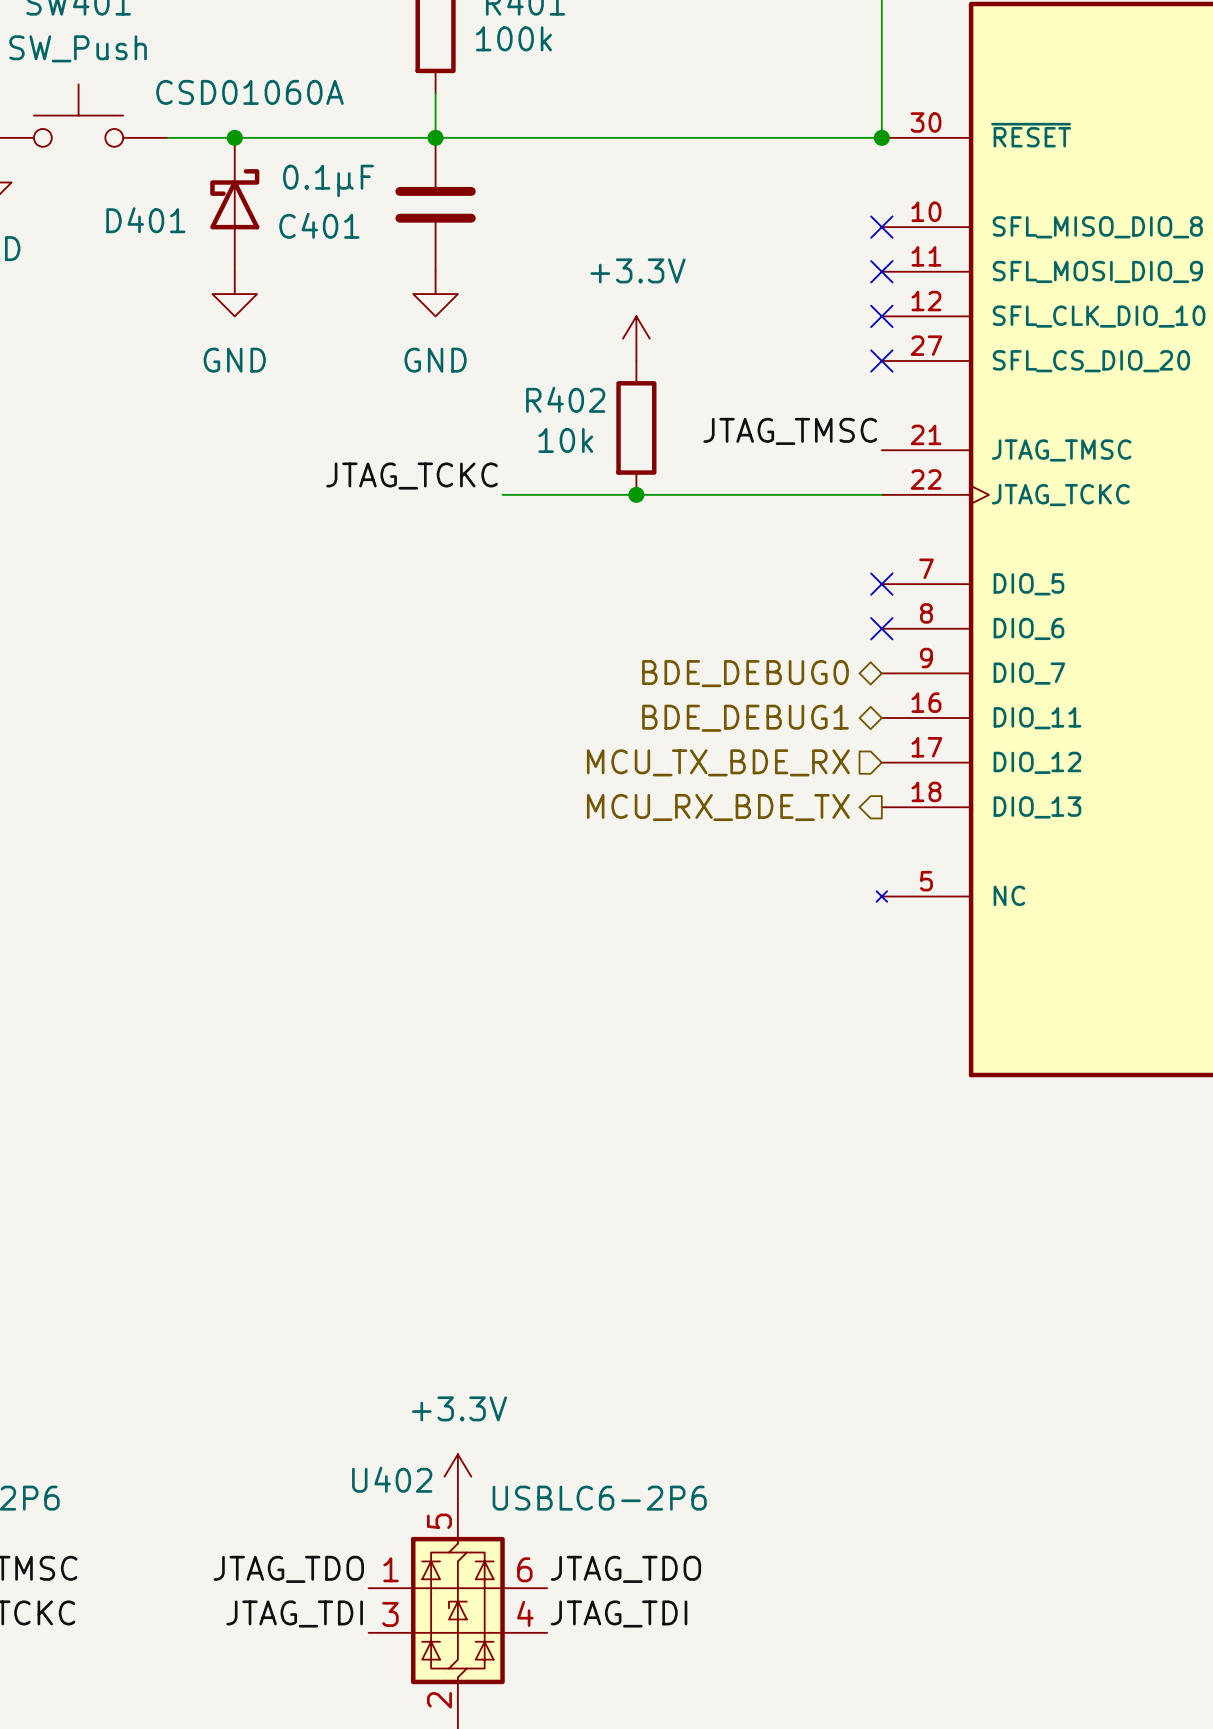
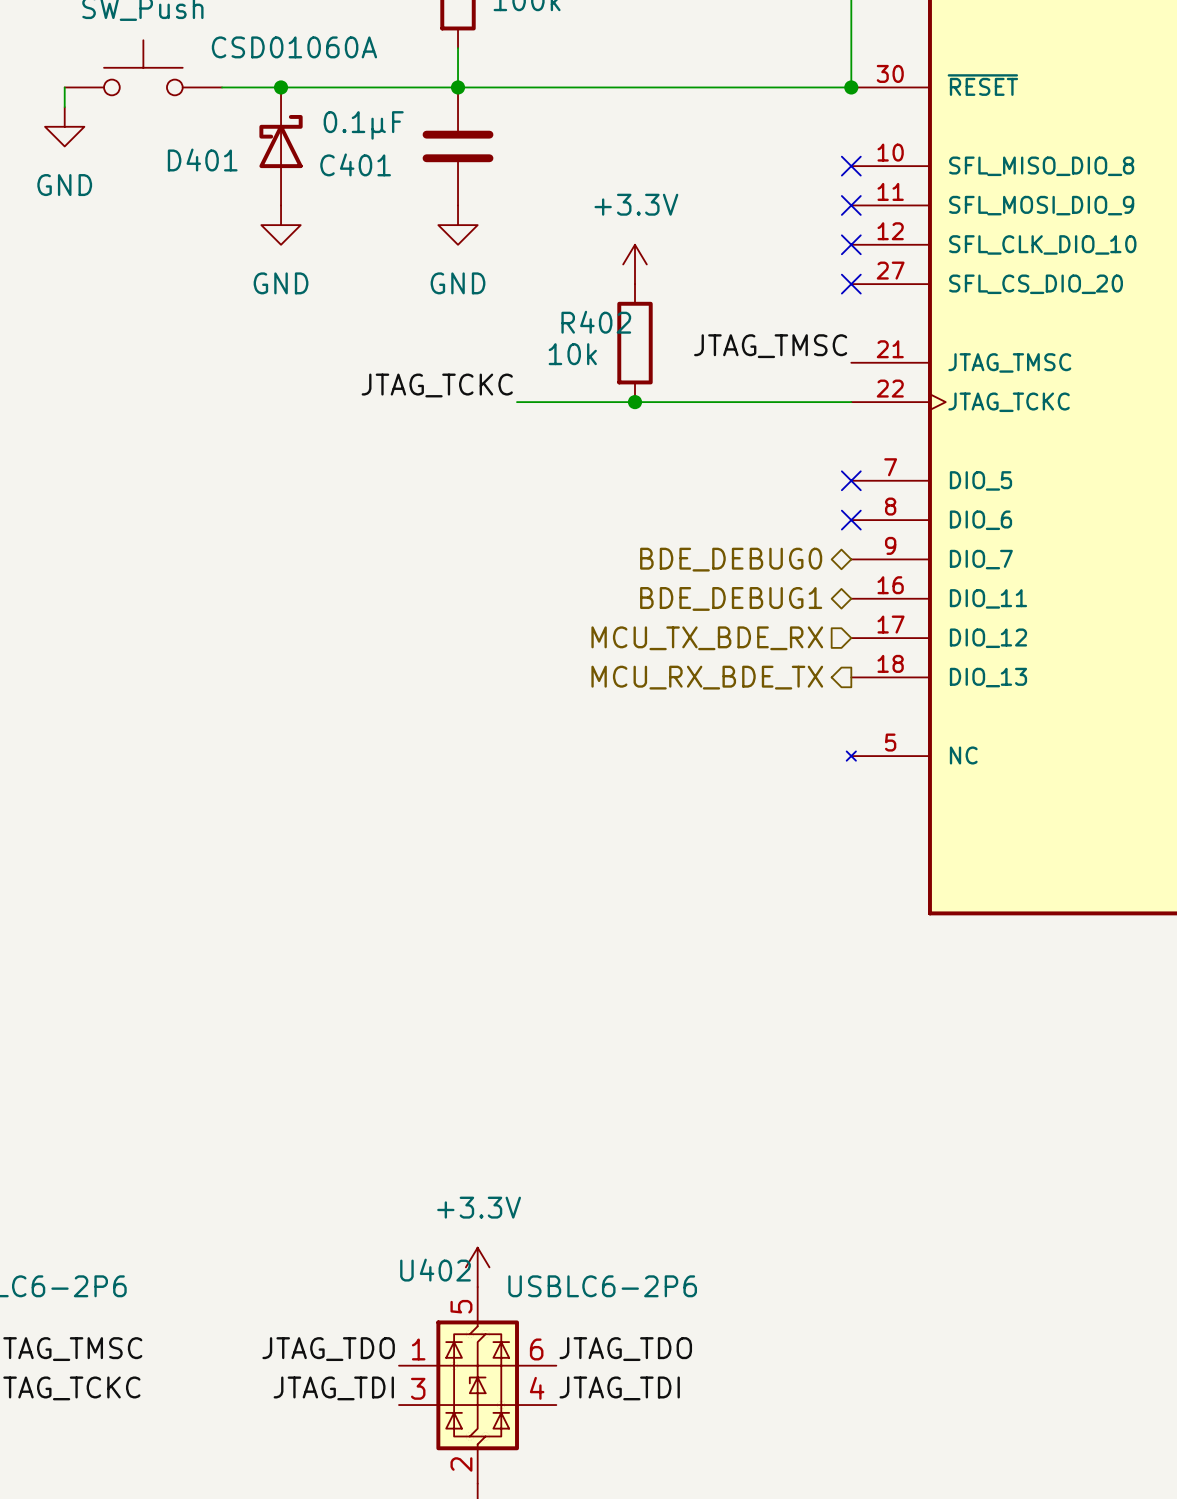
R402 name position: R402 (565, 399) -> R402 (596, 322)
U402 name position: U402 (392, 1479) -> U402 (435, 1270)

